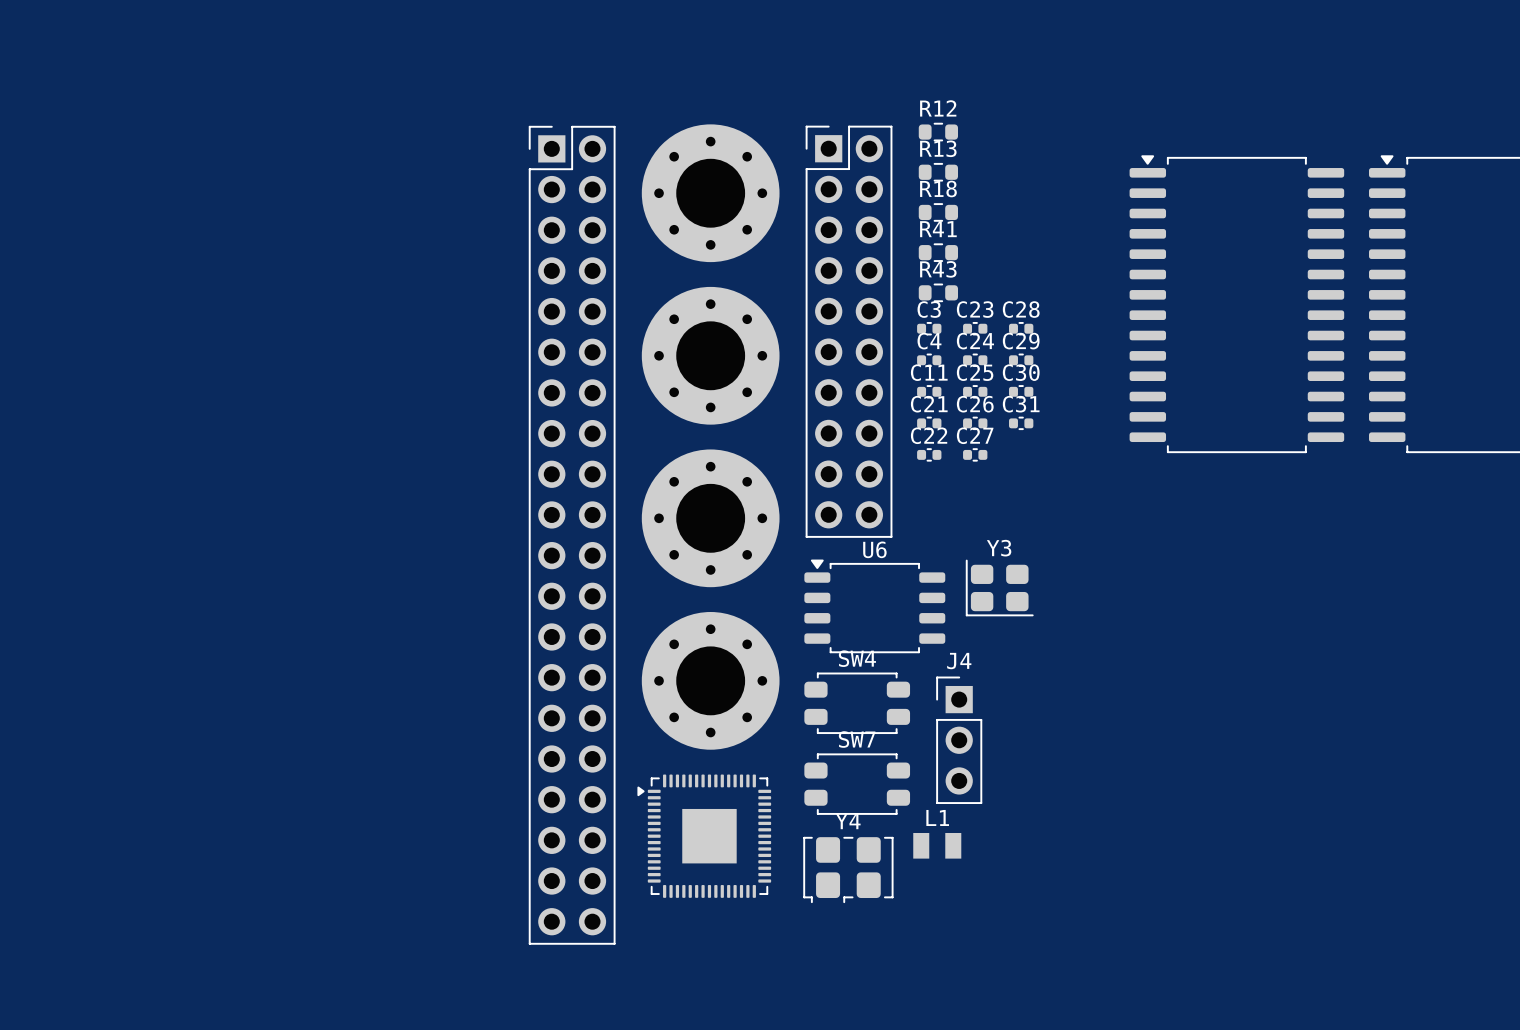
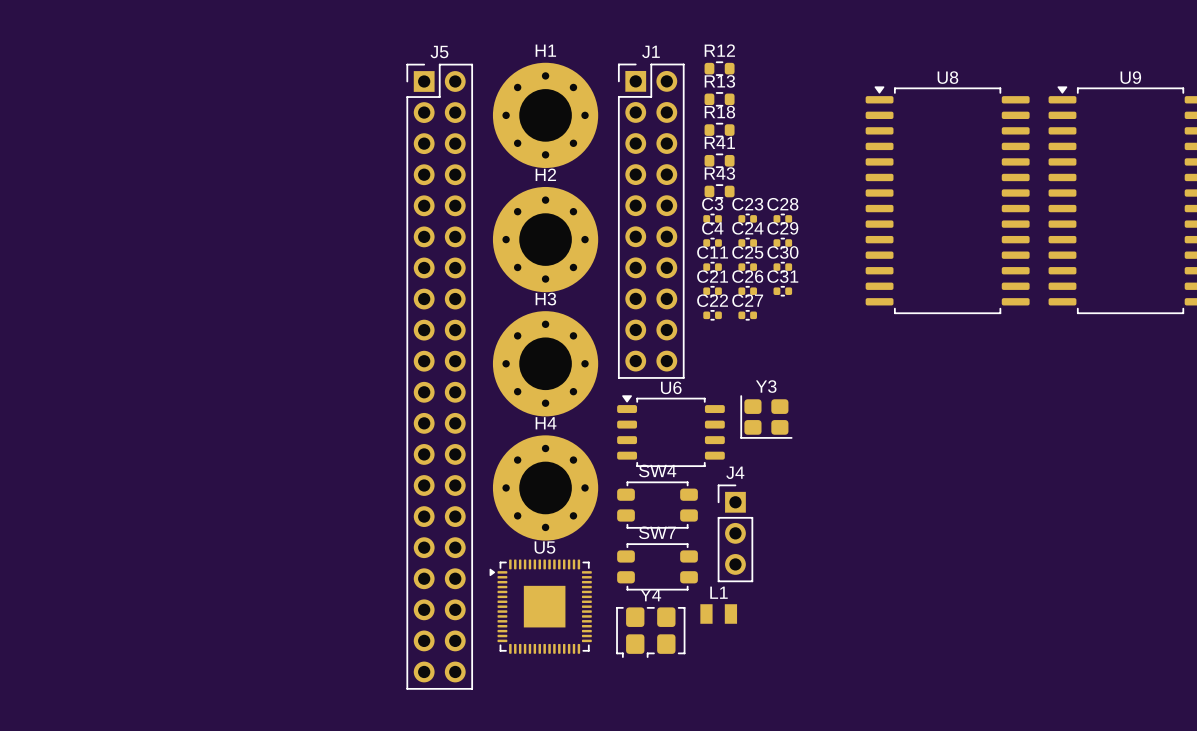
H1 name: none -> H1 (545, 50)
J5 name: none -> J5 (439, 52)
J1 name: none -> J1 (650, 51)
U8 name: none -> U8 (947, 77)
U9 name: none -> U9 (1130, 77)
H2 name: none -> H2 (545, 174)
H3 name: none -> H3 (545, 299)
H4 name: none -> H4 (546, 423)
U5 name: none -> U5 (544, 547)

